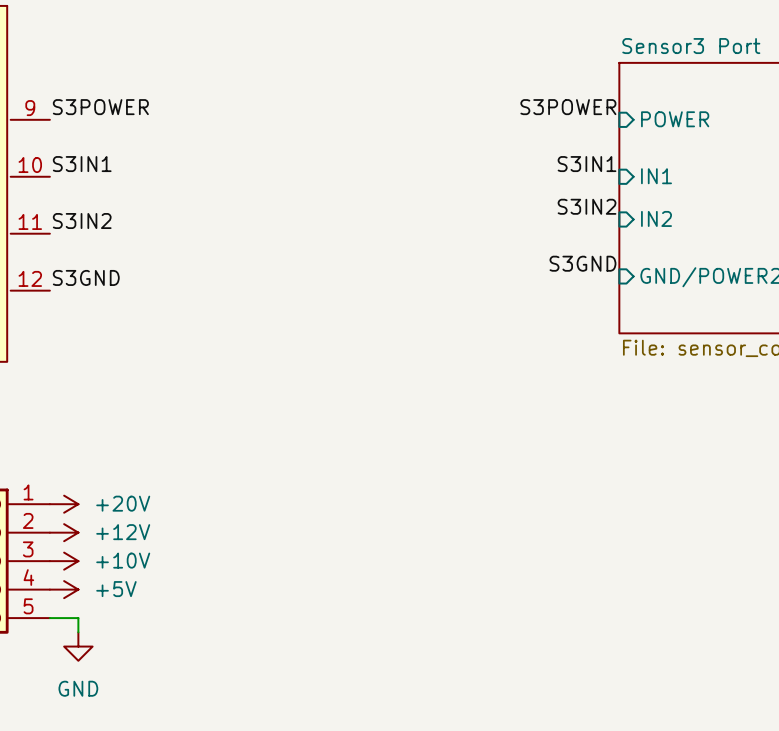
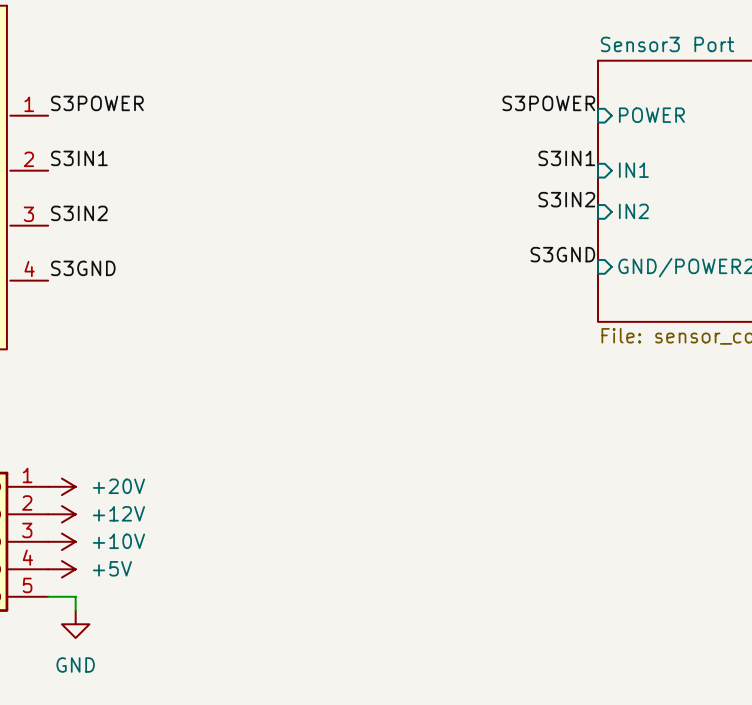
part pin number: 9 (30, 108) -> 1 (29, 104)
part pin number: 10 (30, 165) -> 2 (28, 159)
part pin number: 11 (30, 221) -> 3 (28, 214)
part pin number: 12 (30, 278) -> 4 (29, 268)

